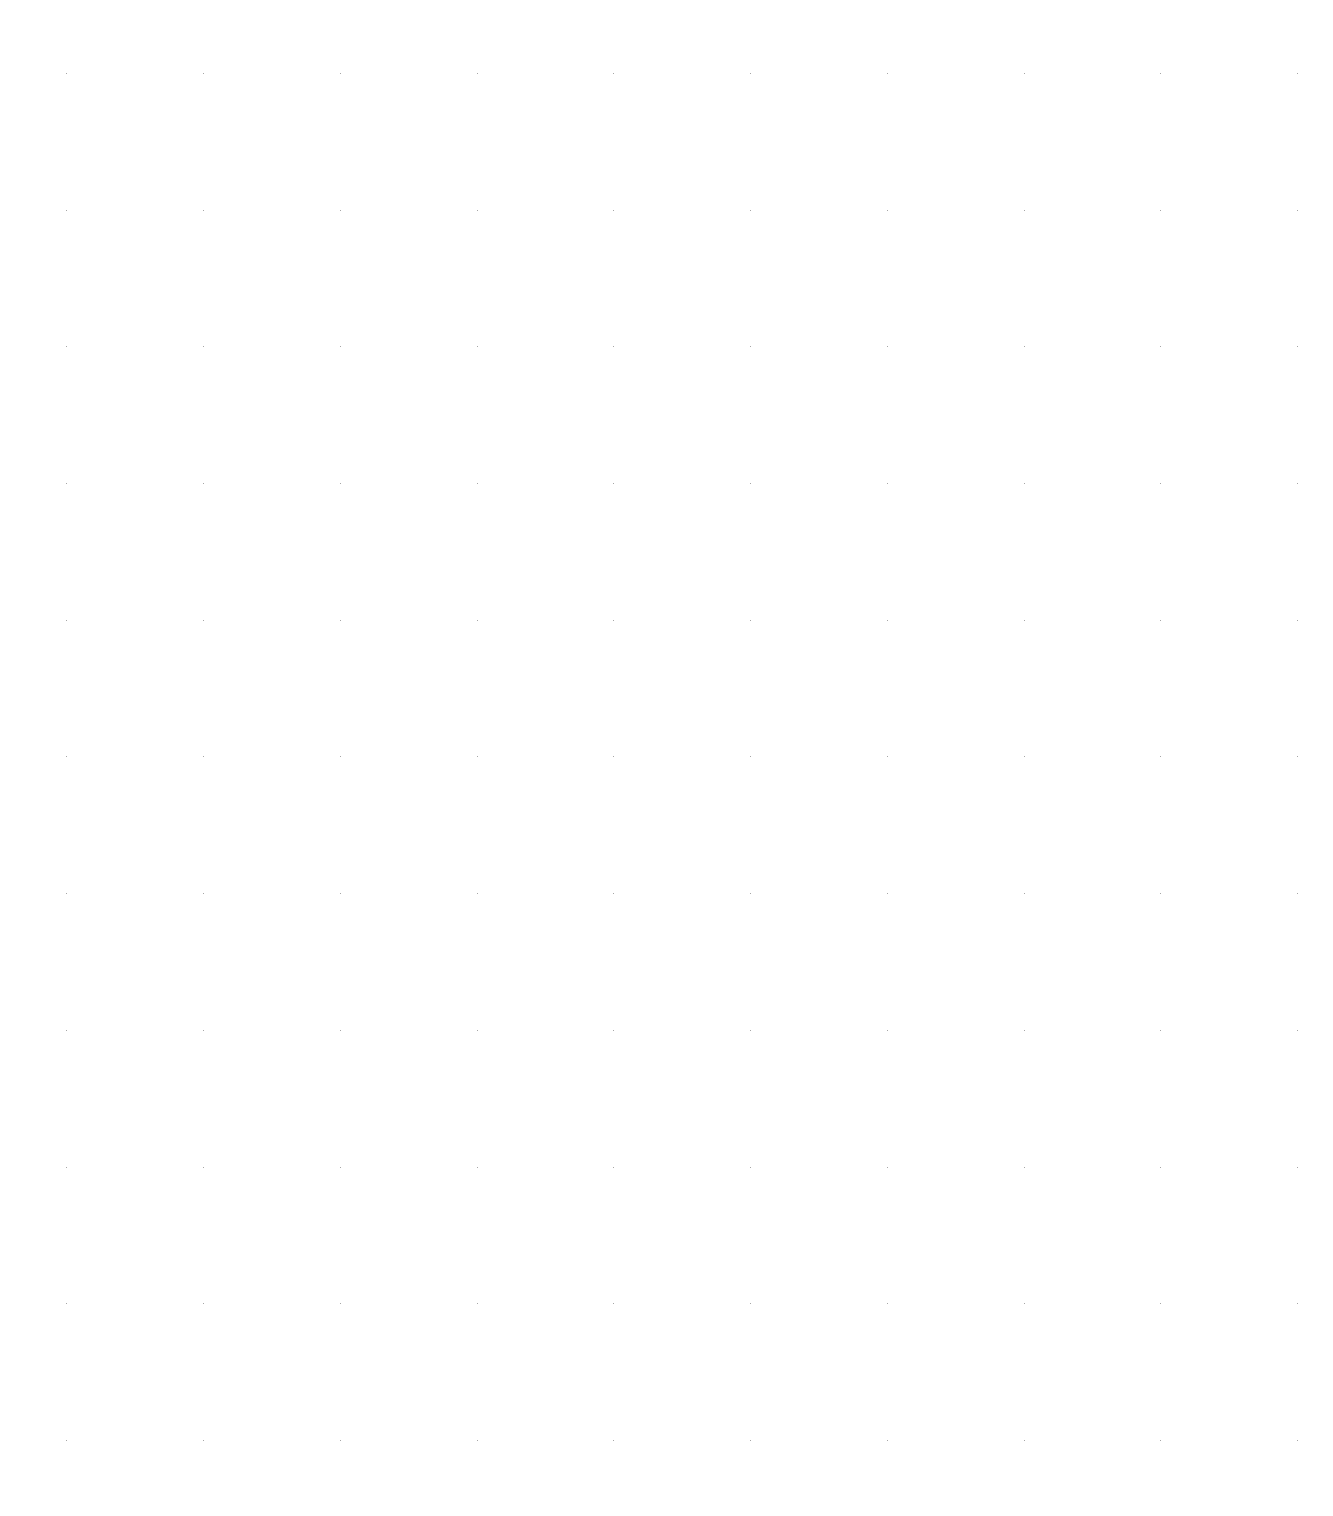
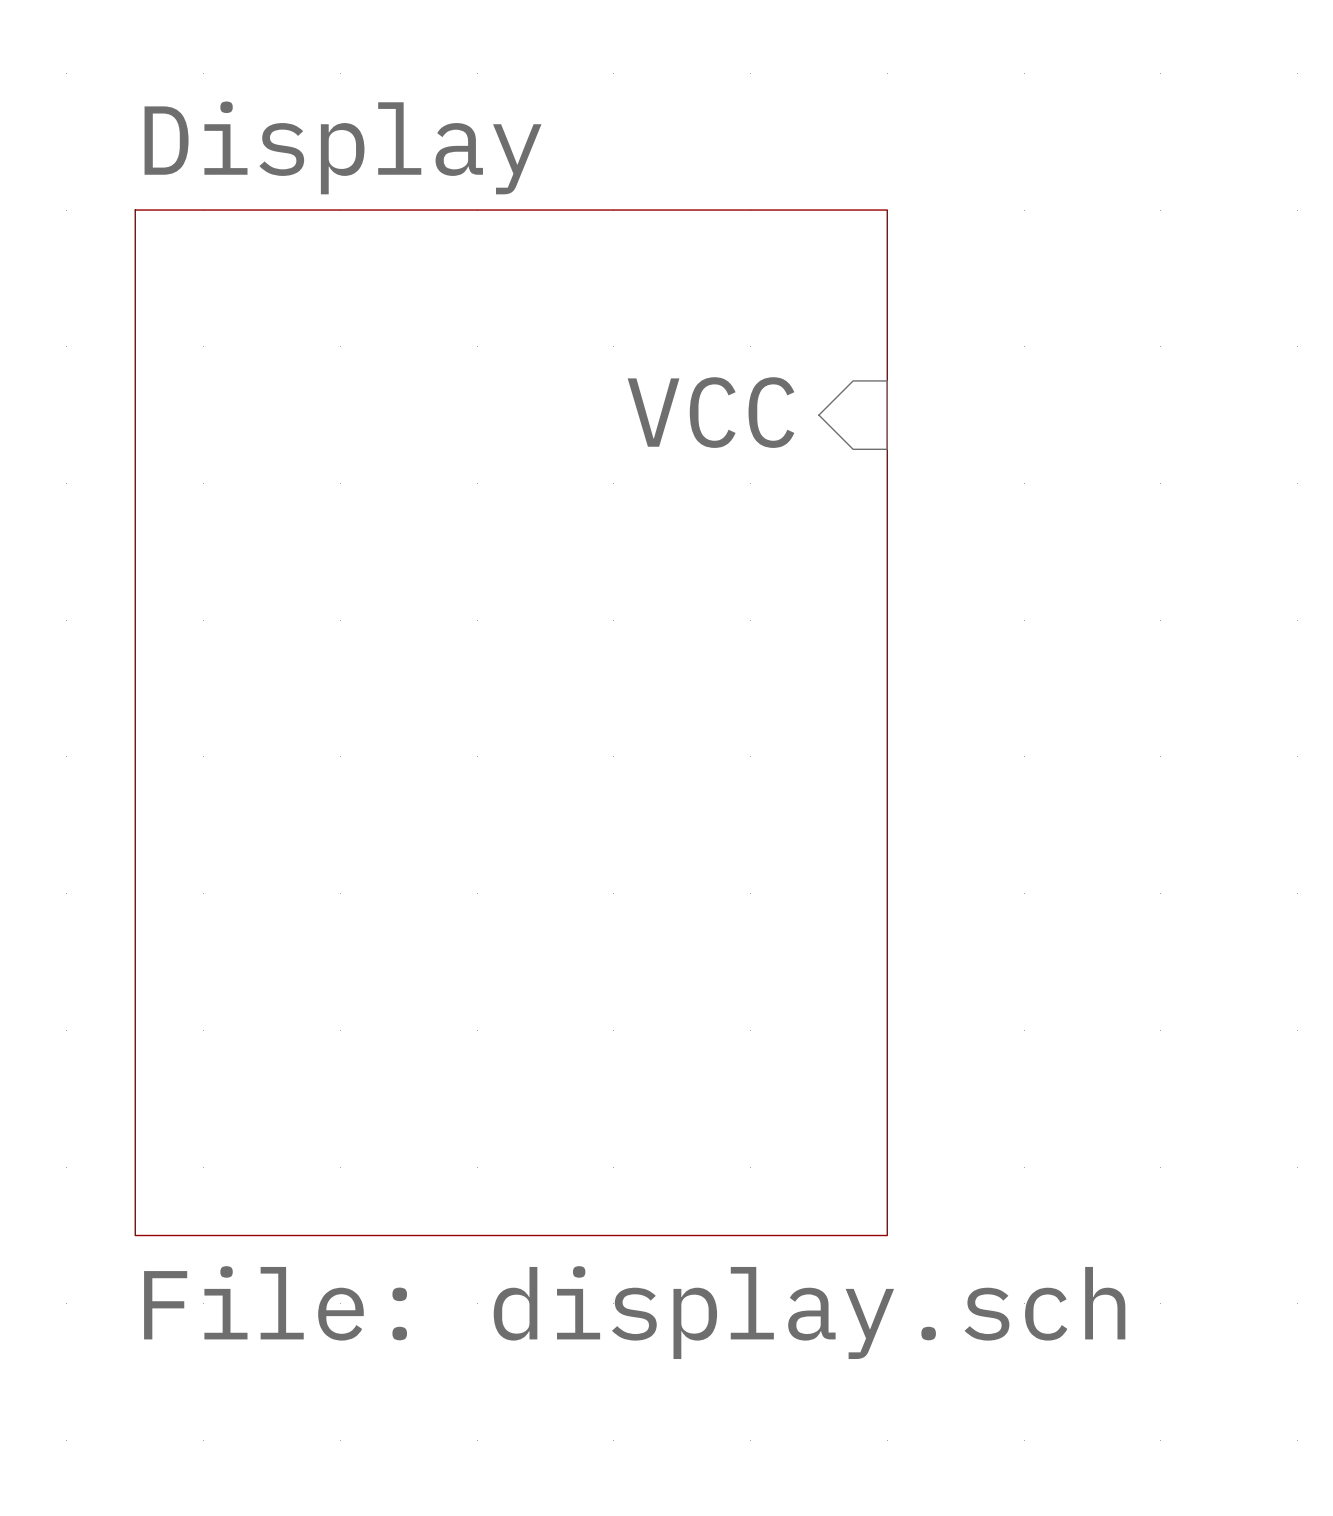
sheet pin: none -> VCC (711, 412)
sheet Display: none -> File: display.sch (511, 722)

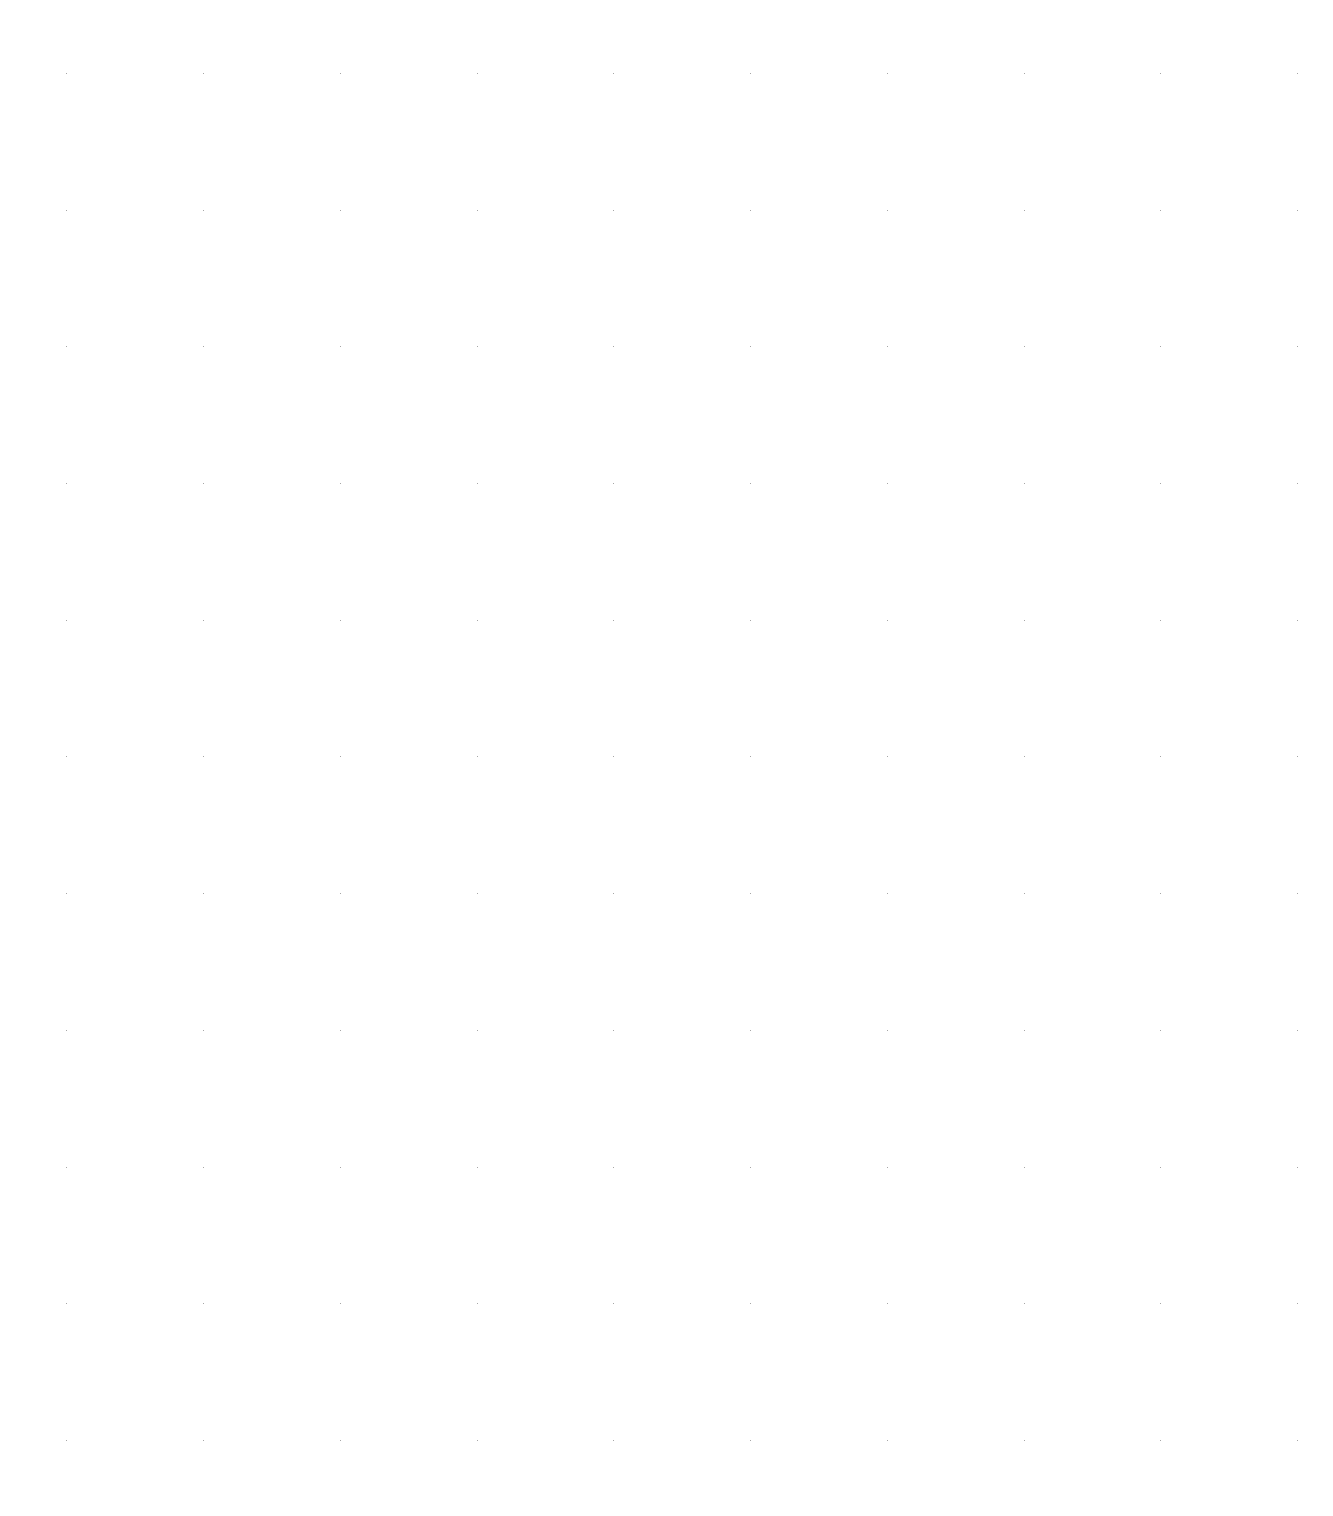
sheet pin: VCC (711, 412) -> none
sheet Display: File: display.sch (511, 722) -> none

